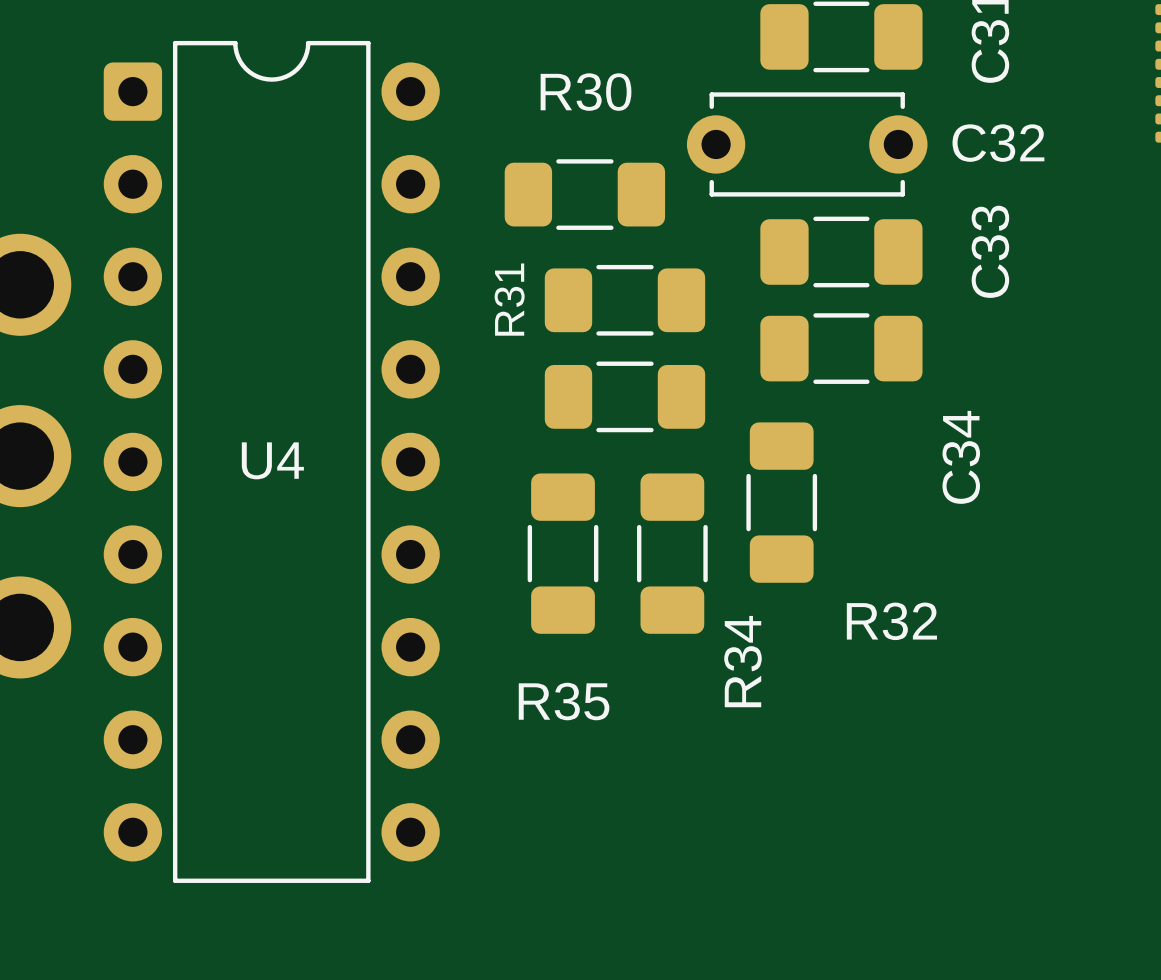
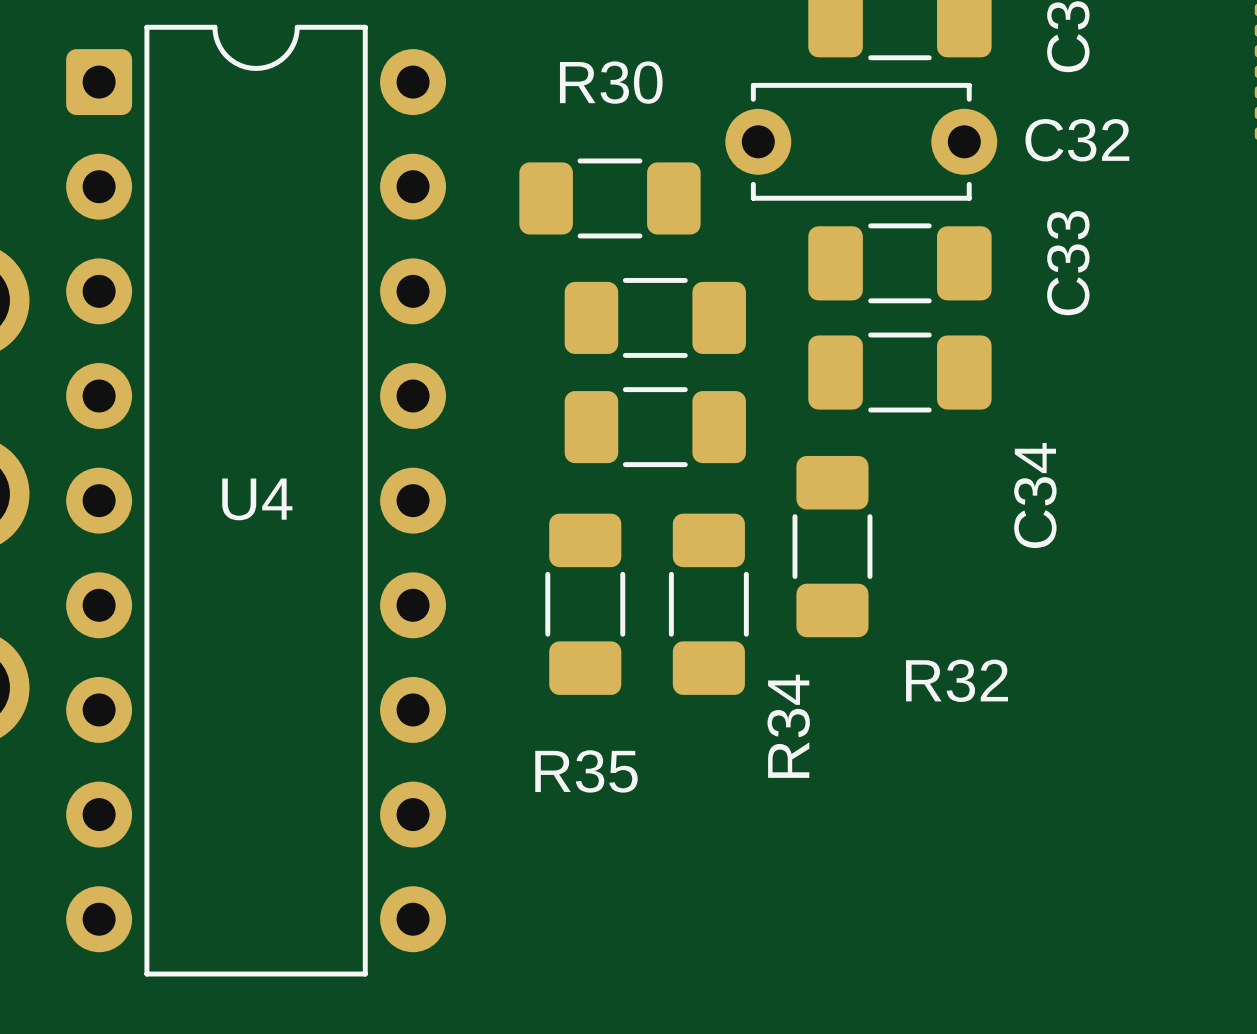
R31 name: R31 (509, 299) -> none

